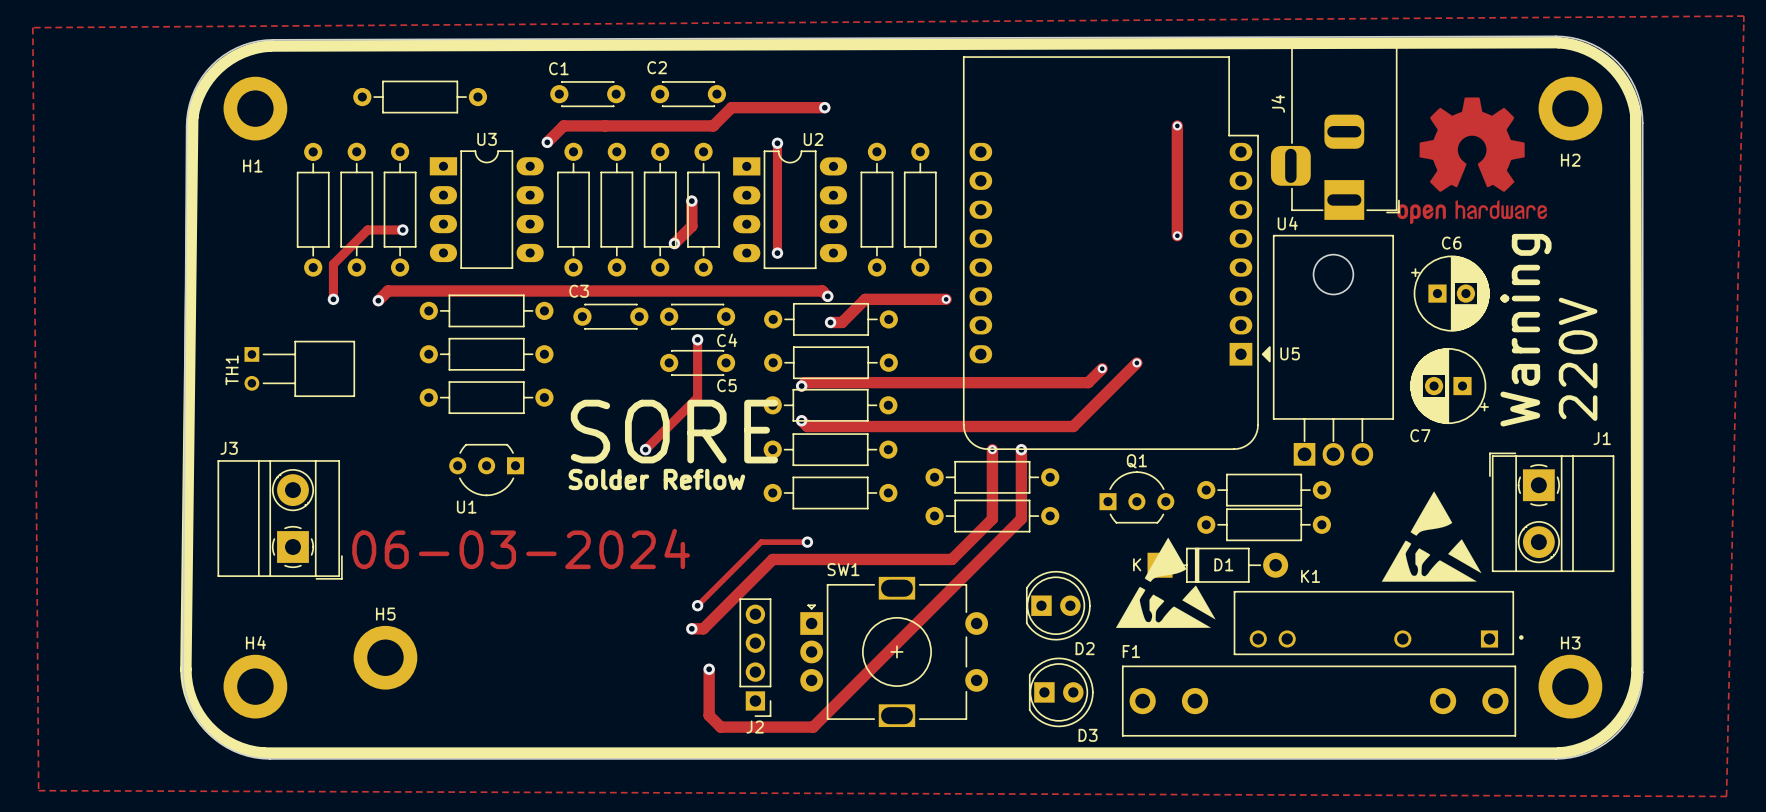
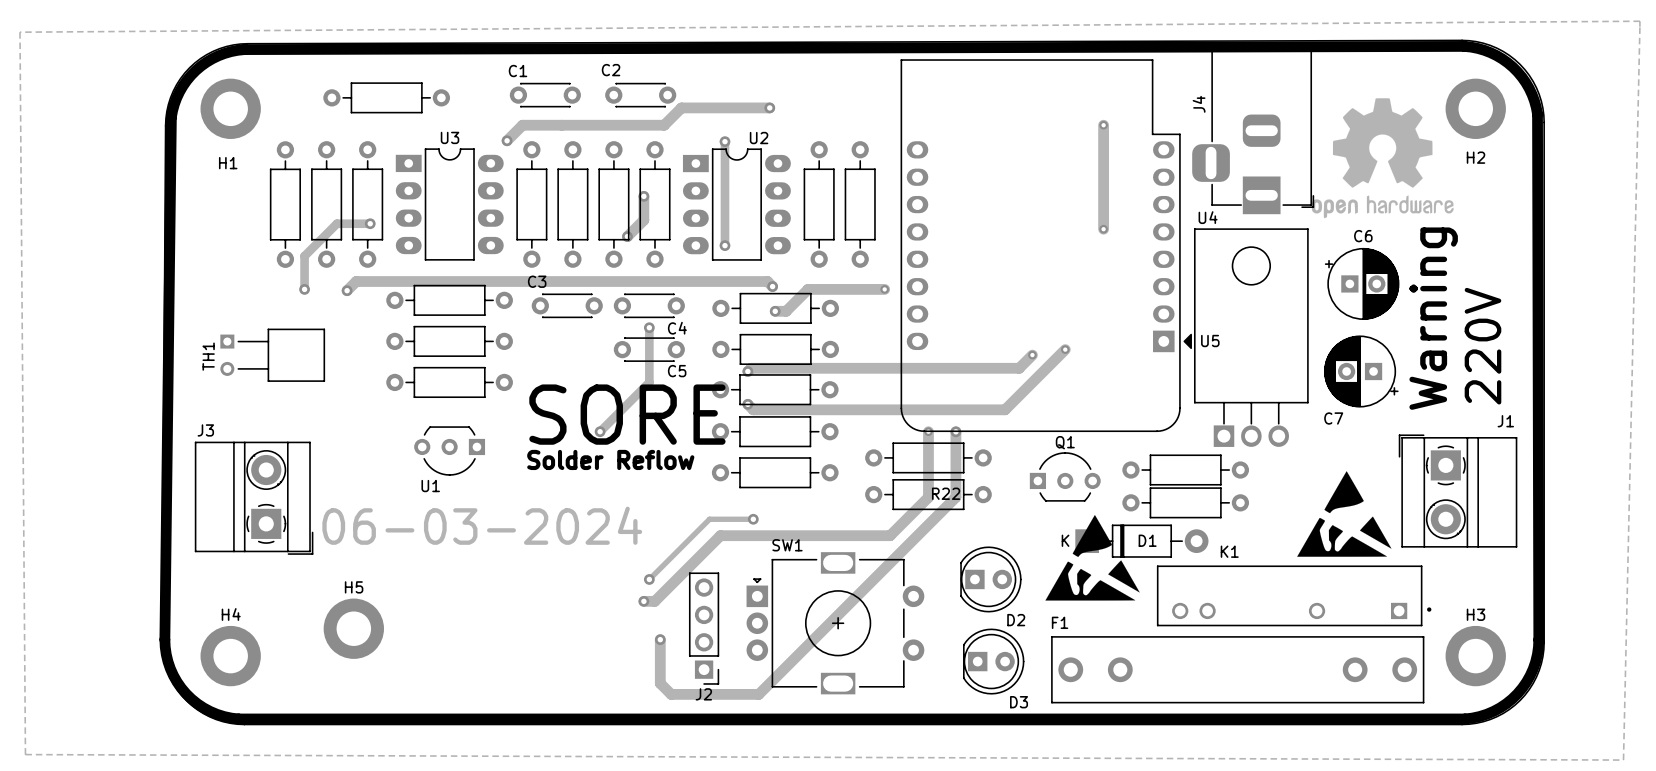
R22 name: none -> R22 (946, 493)

